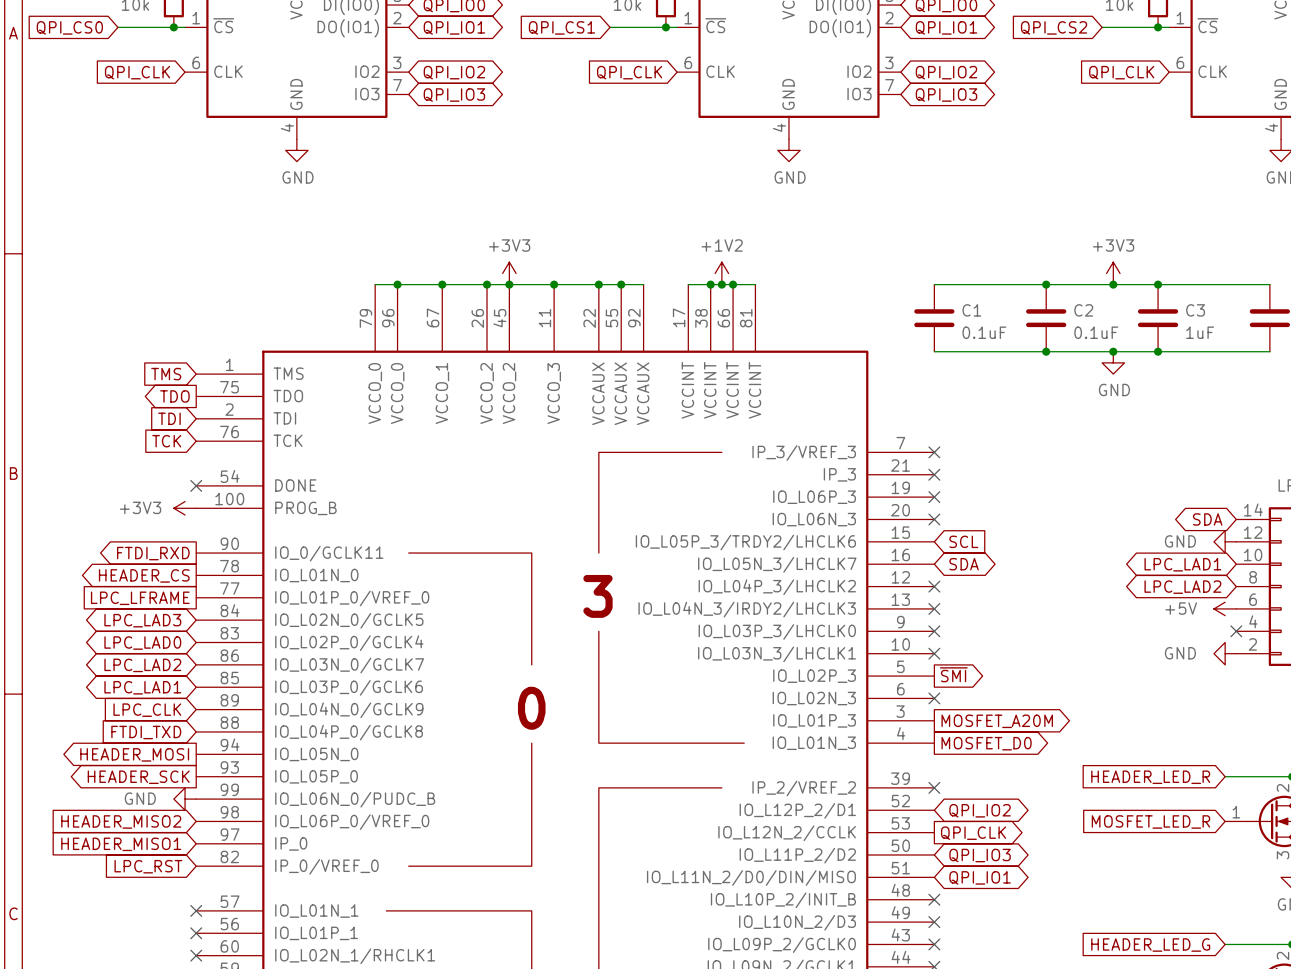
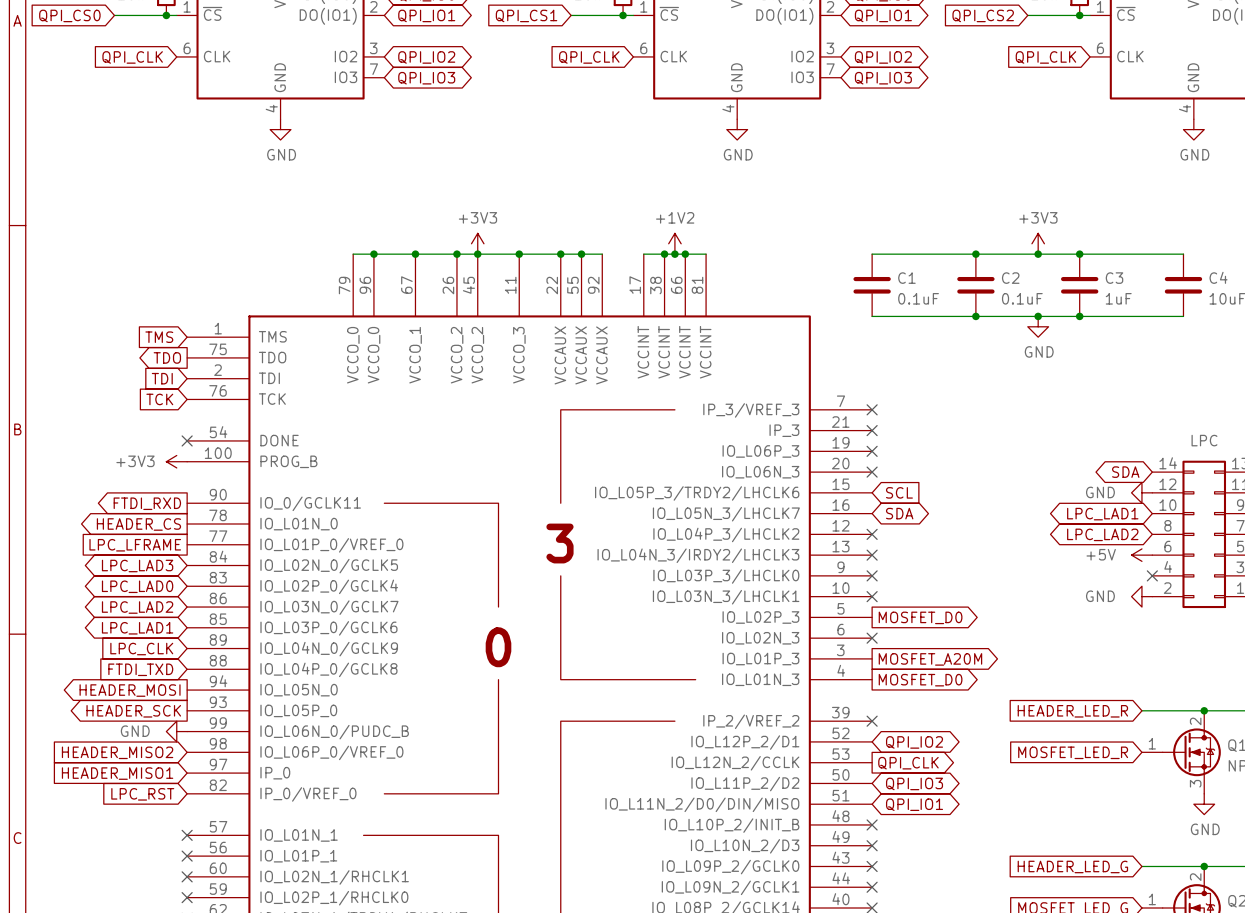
global label: ~{SMI} (953, 674) -> MOSFET_D0 (920, 617)

